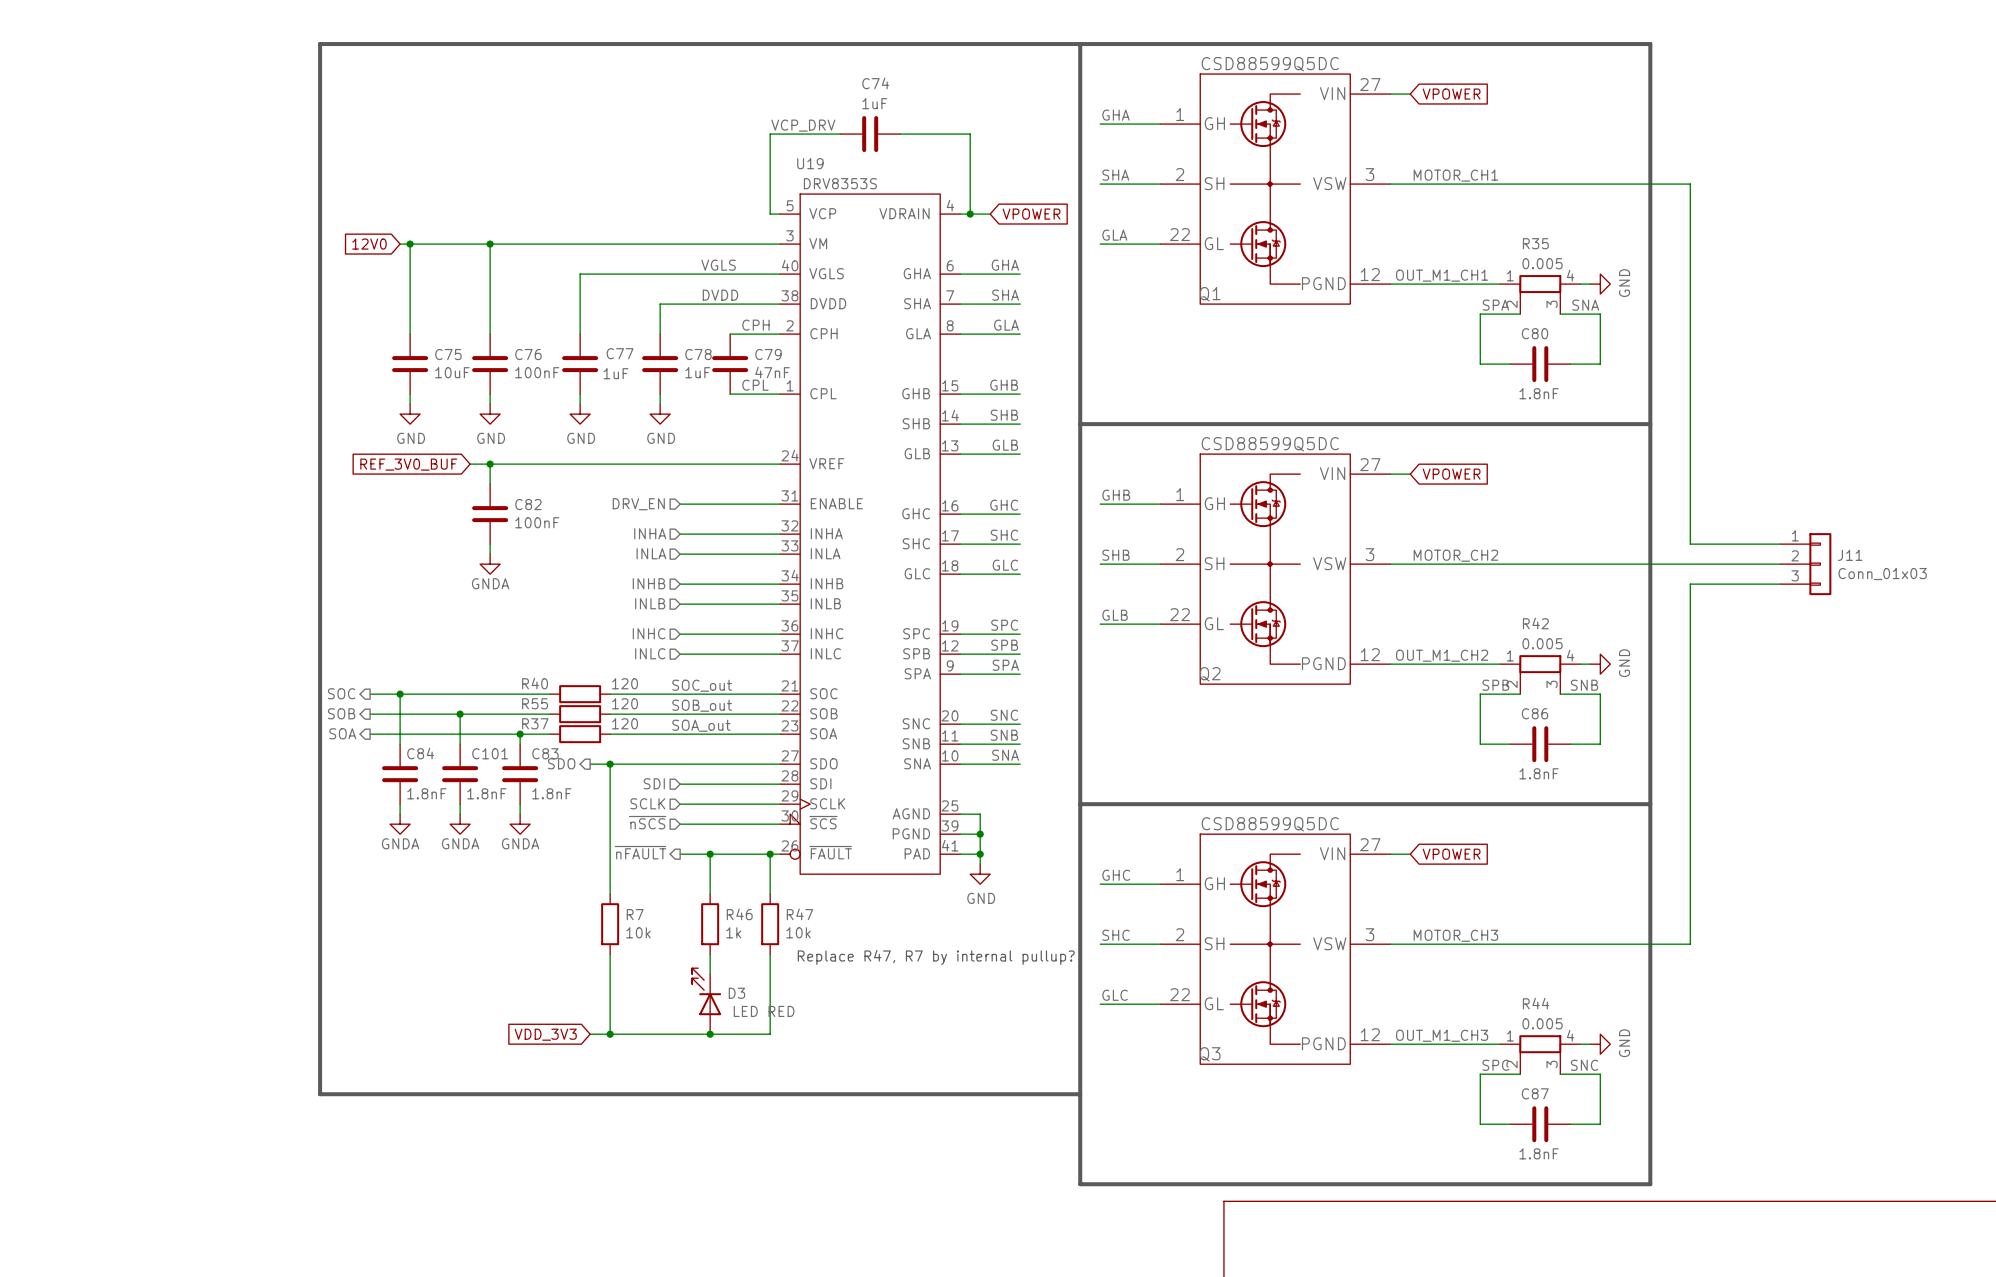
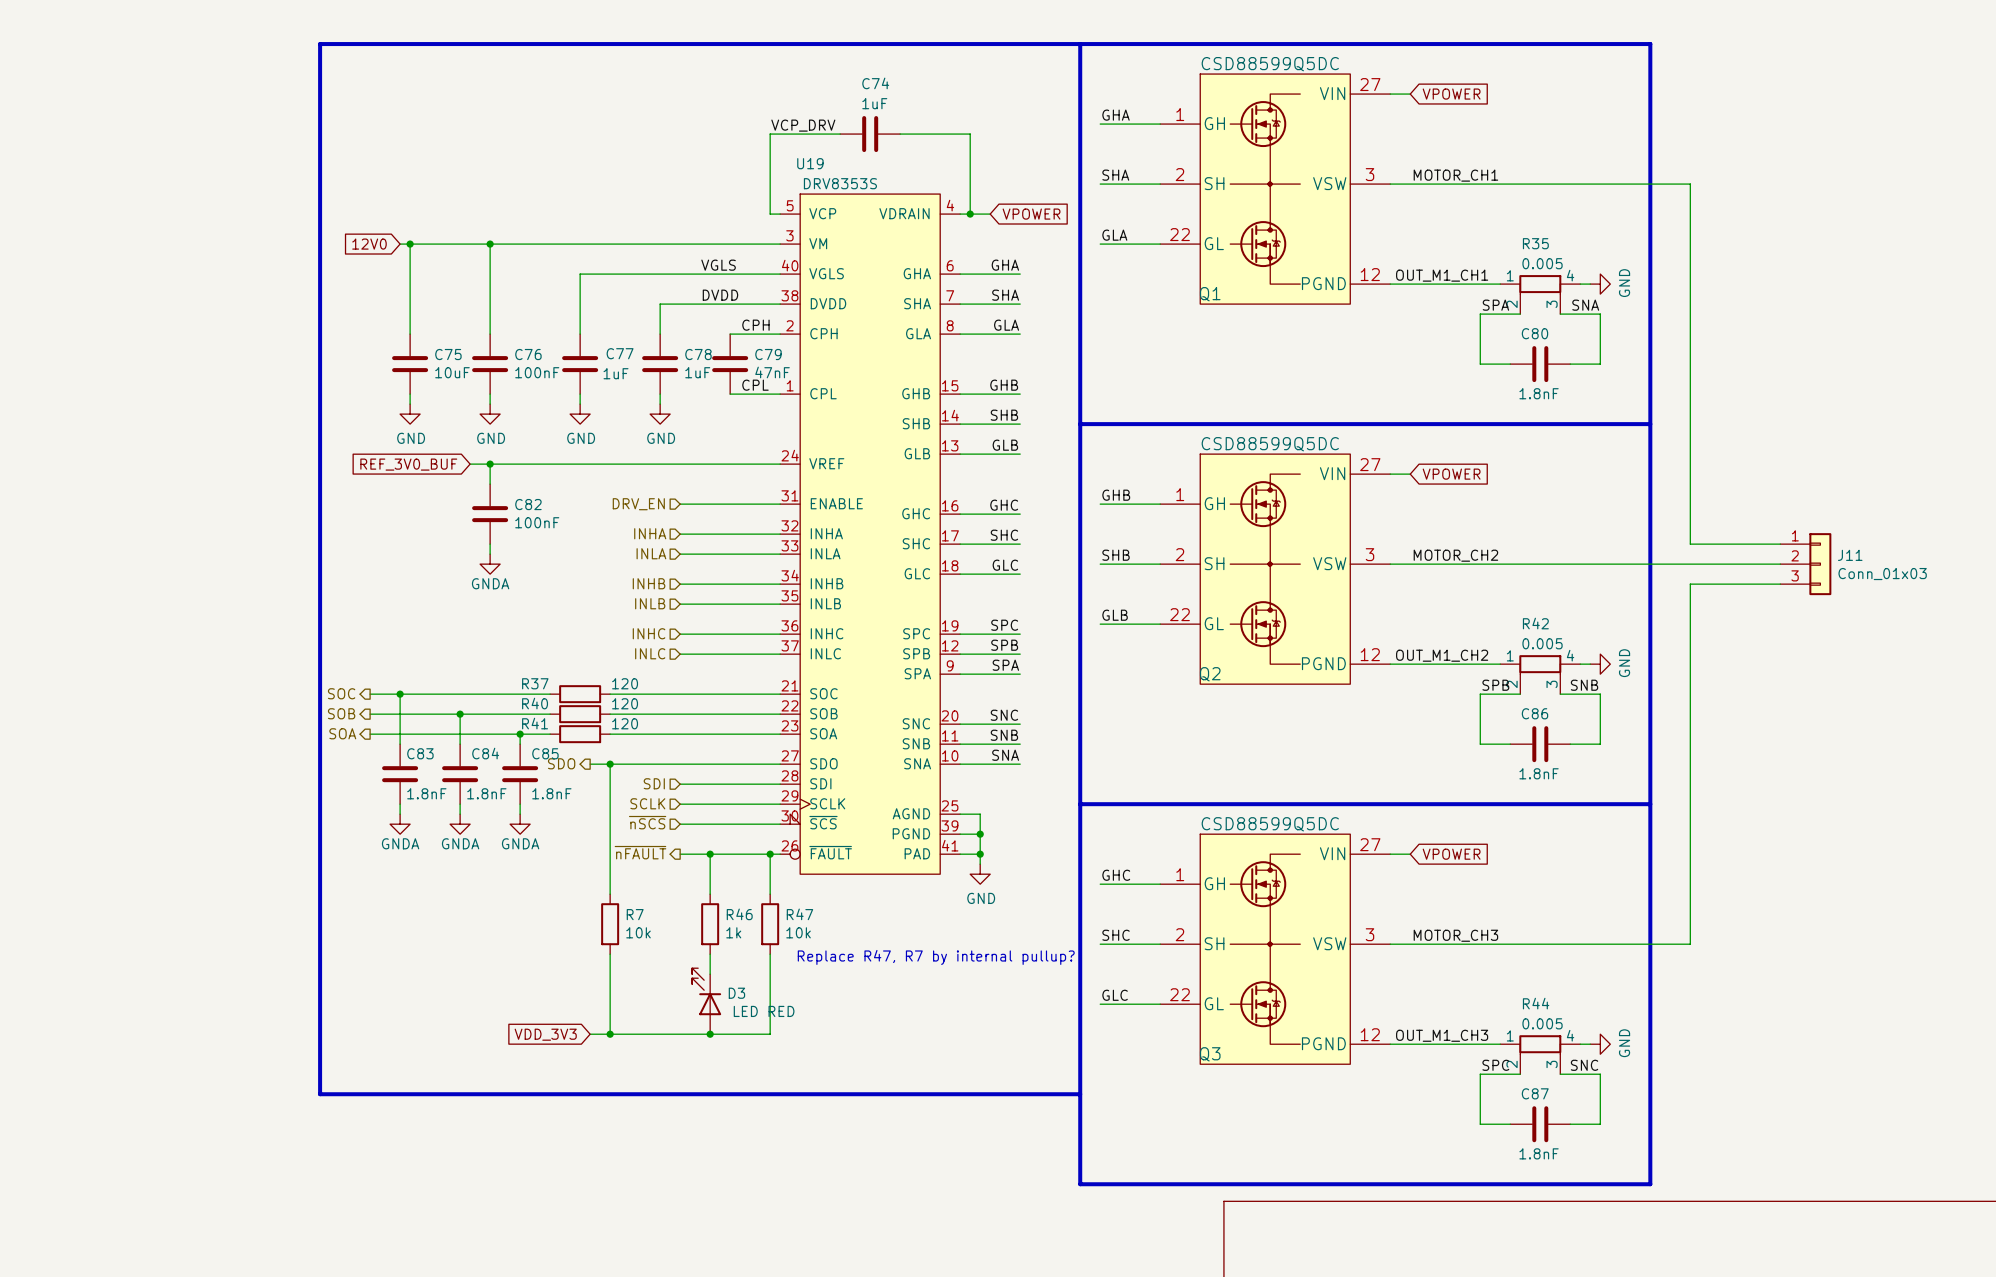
R40 name: R40 (535, 683) -> R37 (535, 683)
label: SOC_out (702, 685) -> none
R55 name: R55 (535, 703) -> R40 (535, 703)
label: SOB_out (702, 705) -> none
R37 name: R37 (535, 723) -> R41 (535, 723)
label: SOA_out (701, 725) -> none
C84 name: C84 (420, 753) -> C83 (420, 753)
C101 name: C101 (490, 753) -> C84 (485, 753)
C83 name: C83 (545, 753) -> C85 (545, 753)

